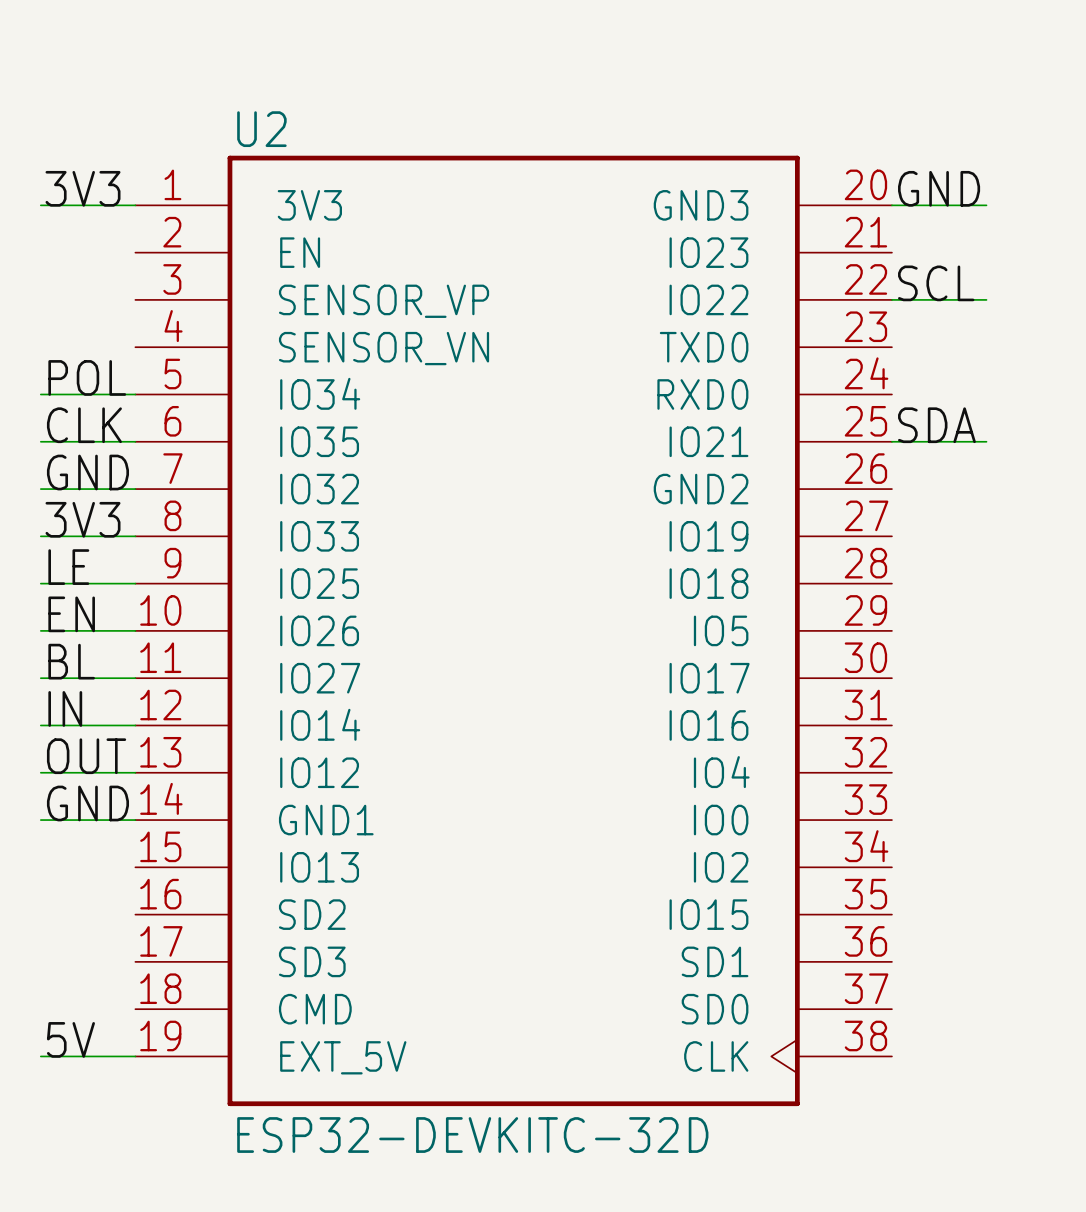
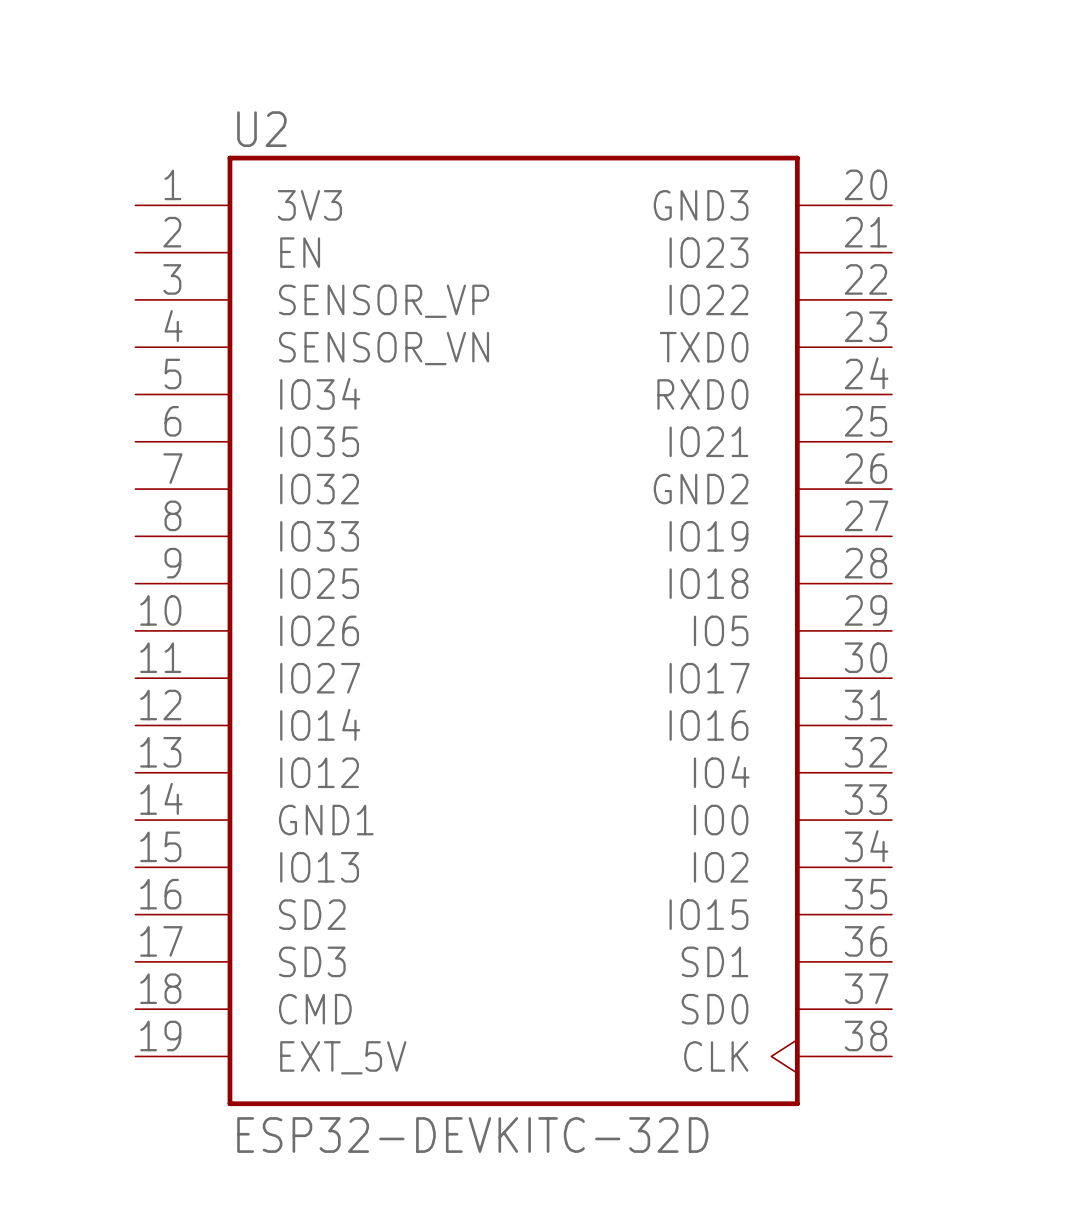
label: 3V3 (83, 188) -> none
label: GND (939, 188) -> none
wire: (40, 205) (135, 205) -> none
wire: (891, 205) (986, 205) -> none
label: SCL (936, 283) -> none
wire: (891, 299) (986, 299) -> none
label: POL (87, 377) -> none
wire: (40, 394) (135, 394) -> none
label: CLK (84, 425) -> none
label: SDA (936, 425) -> none
wire: (40, 441) (135, 441) -> none
wire: (891, 441) (986, 441) -> none
label: GND (87, 472) -> none
wire: (40, 489) (135, 489) -> none
label: 3V3 (83, 519) -> none
wire: (40, 536) (135, 536) -> none
label: LE (68, 567) -> none
wire: (40, 583) (135, 583) -> none
label: EN (71, 614) -> none
wire: (40, 630) (135, 630) -> none
label: BL (71, 661) -> none
wire: (40, 678) (135, 678) -> none
label: IN (65, 708) -> none
wire: (40, 725) (135, 725) -> none
label: OUT (86, 756) -> none
wire: (40, 772) (135, 772) -> none
label: GND (87, 803) -> none
wire: (40, 820) (135, 820) -> none
label: 5V (70, 1039) -> none
wire: (40, 1056) (135, 1056) -> none

